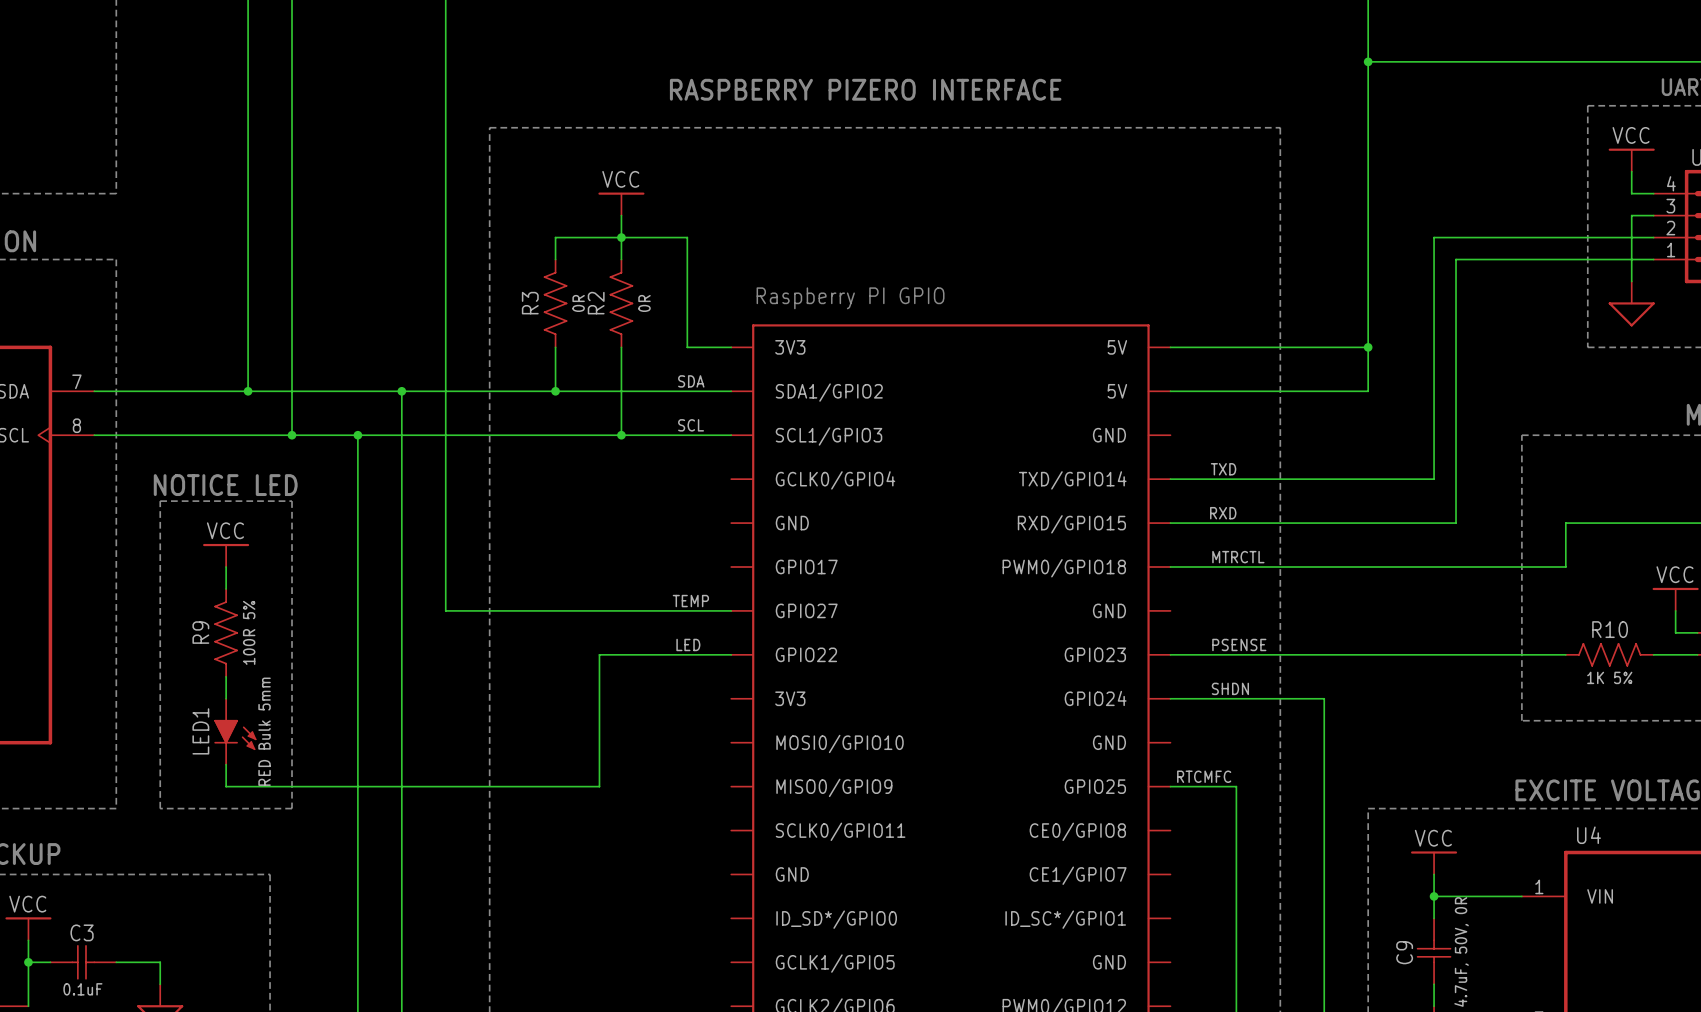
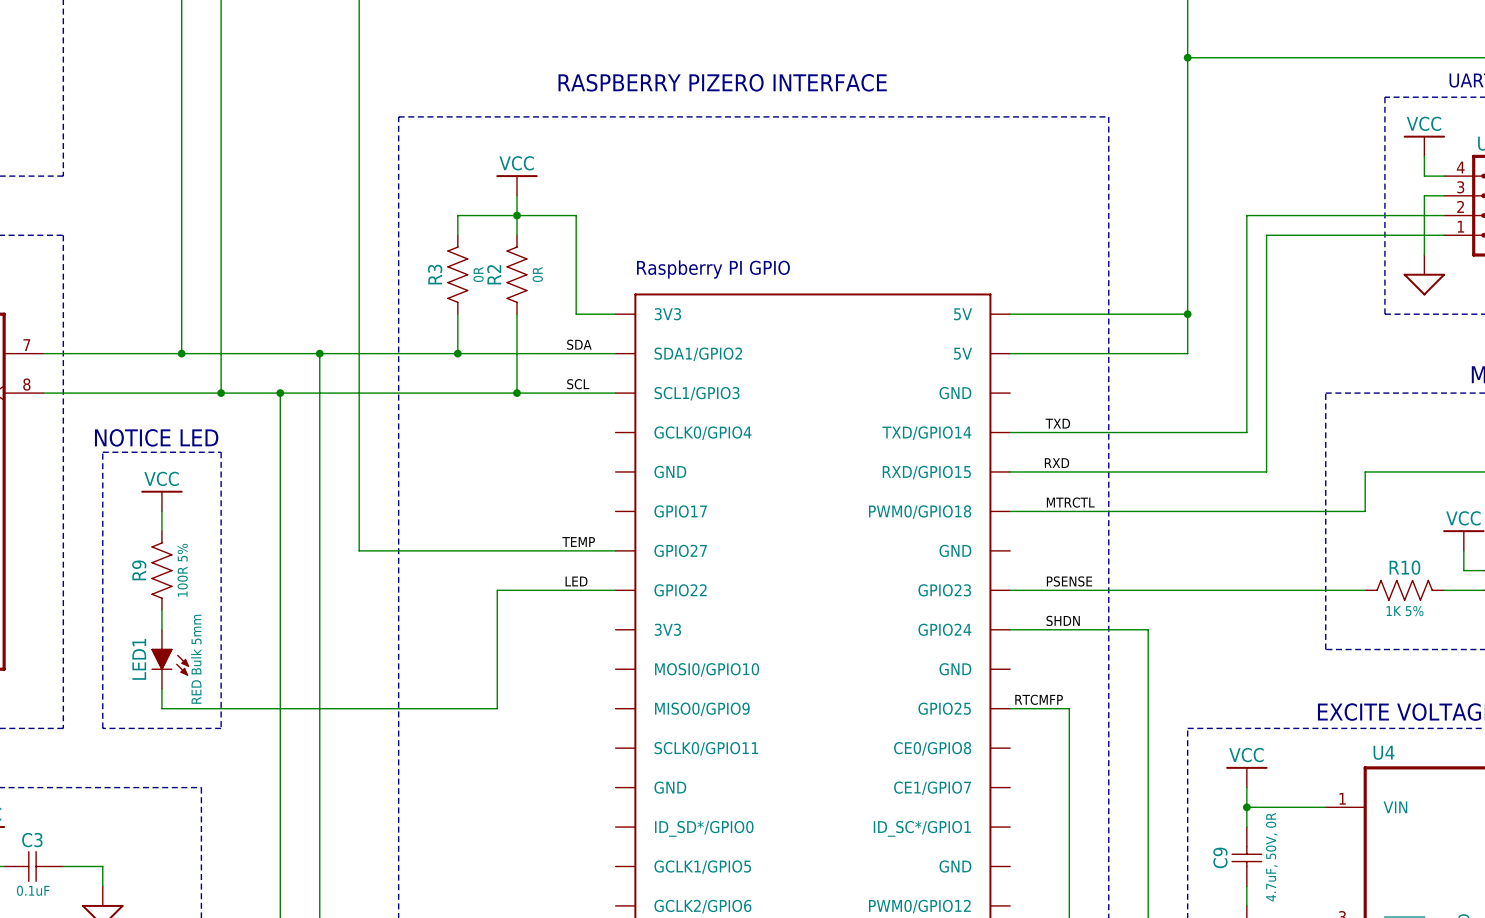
label: RTCMFC (1204, 776) -> RTCMFP (1039, 699)

